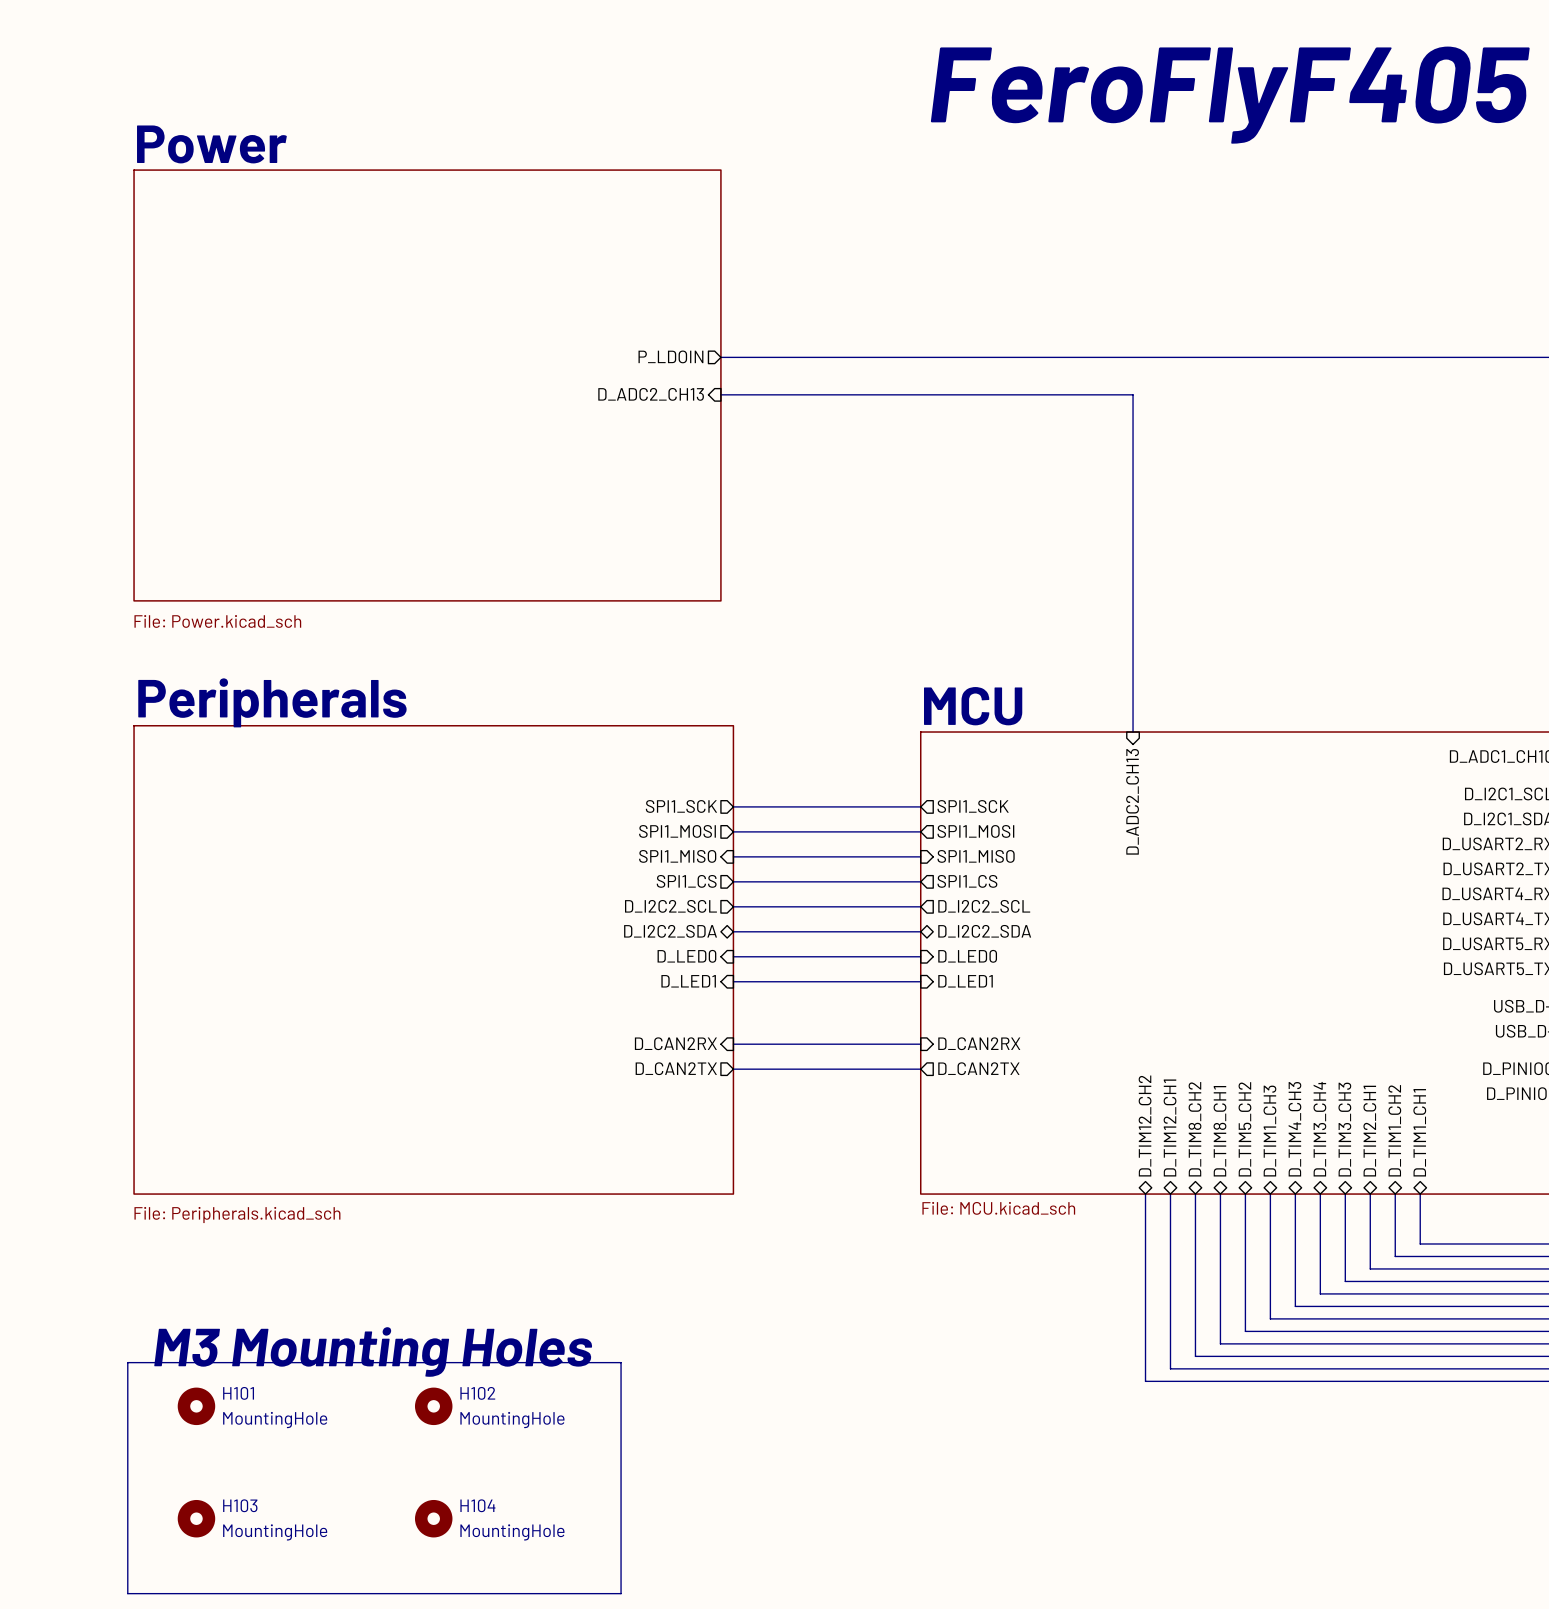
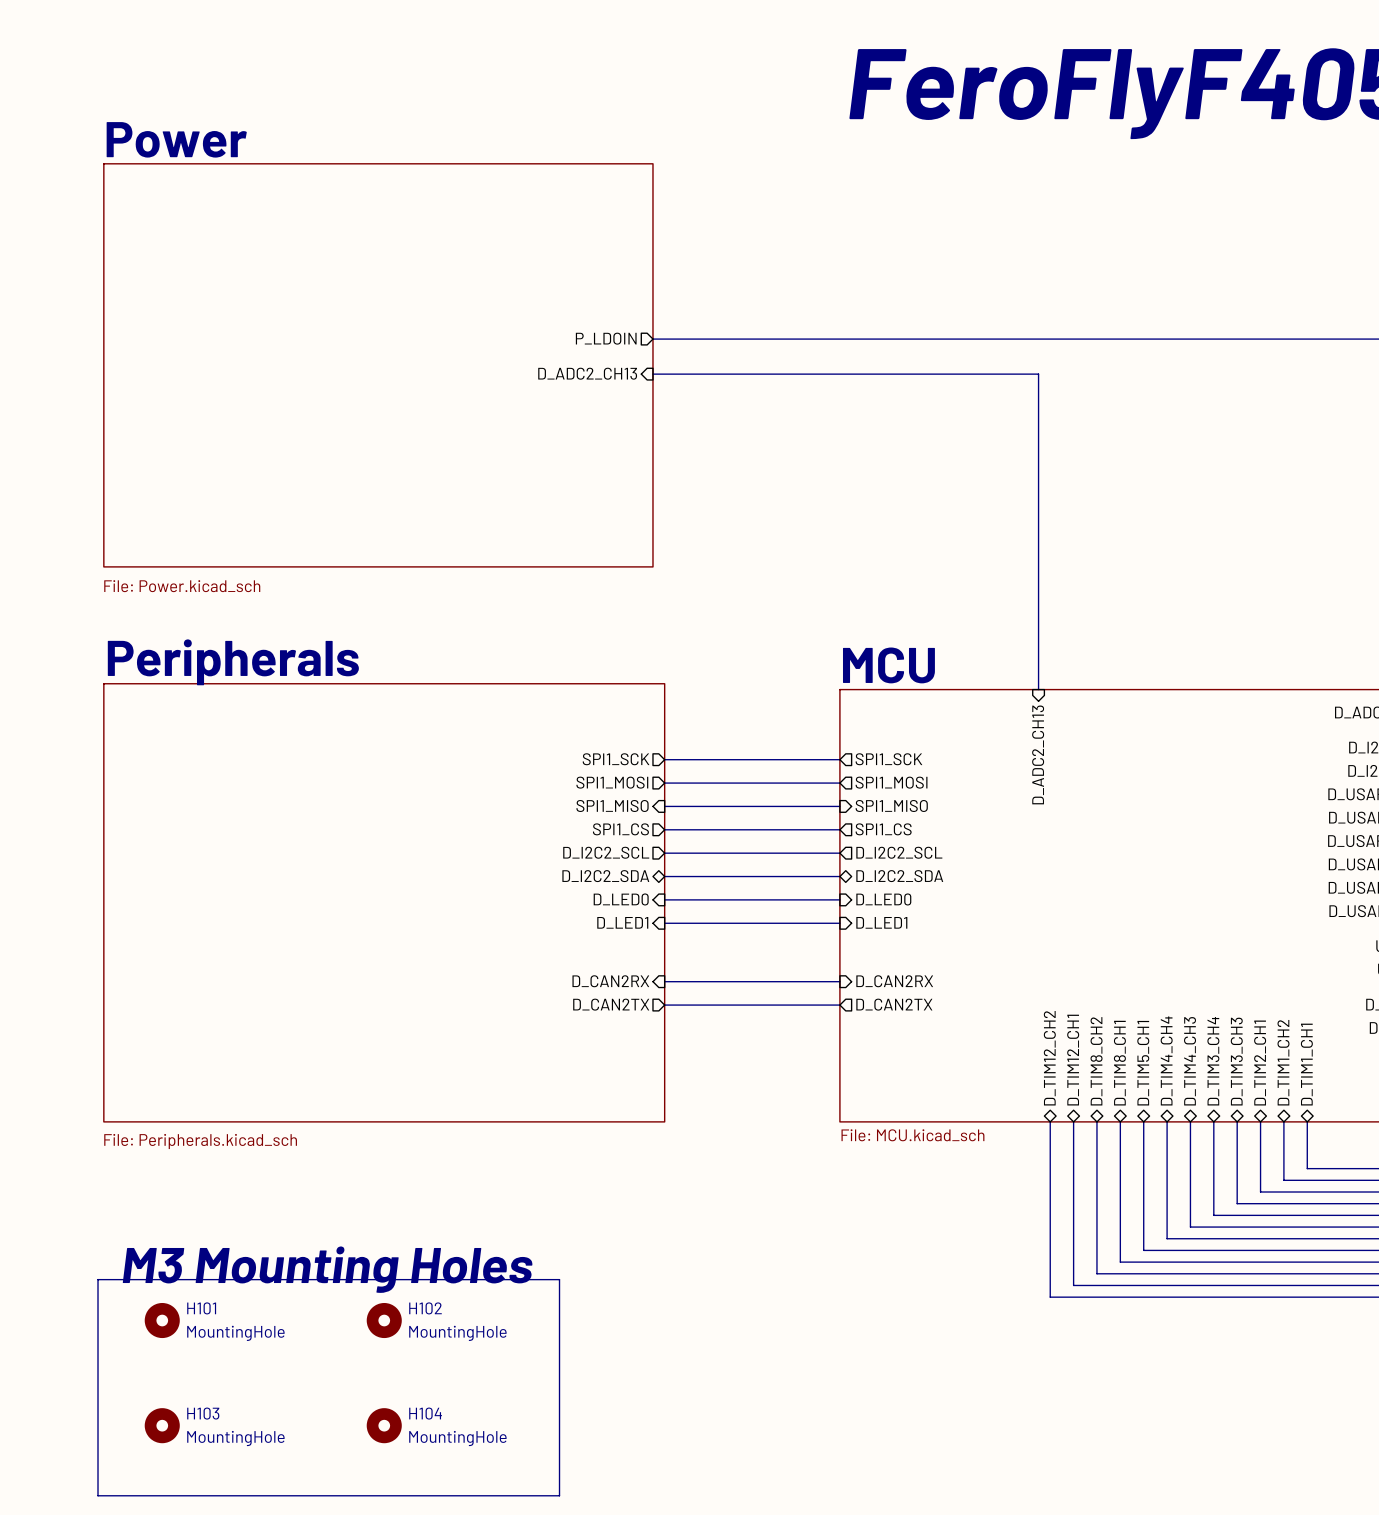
sheet pin: D_TIM5_CH2 (1244, 1129) -> D_TIM5_CH1 (1143, 1063)
sheet pin: D_TIM1_CH3 (1269, 1131) -> D_TIM4_CH4 (1166, 1060)

